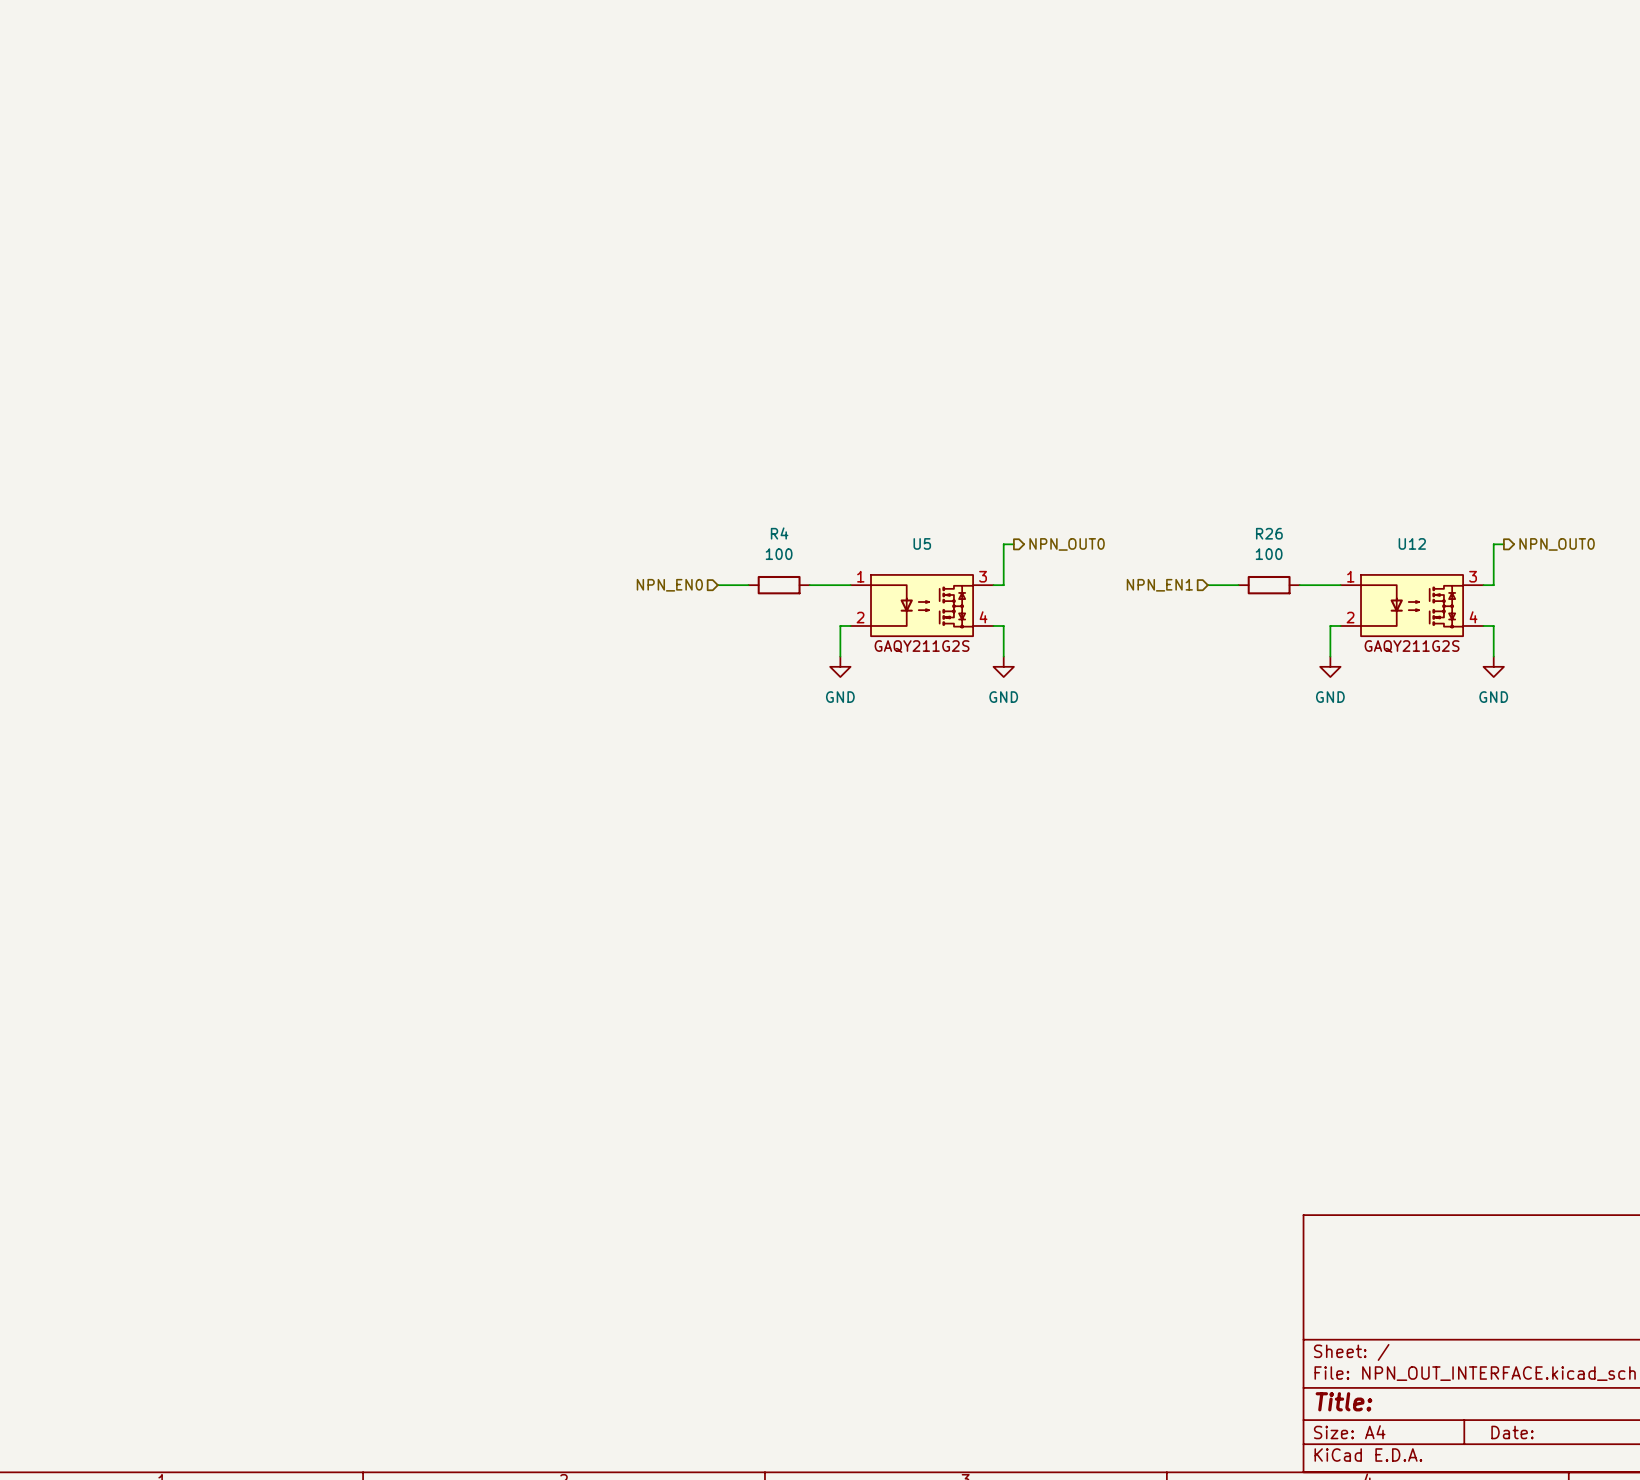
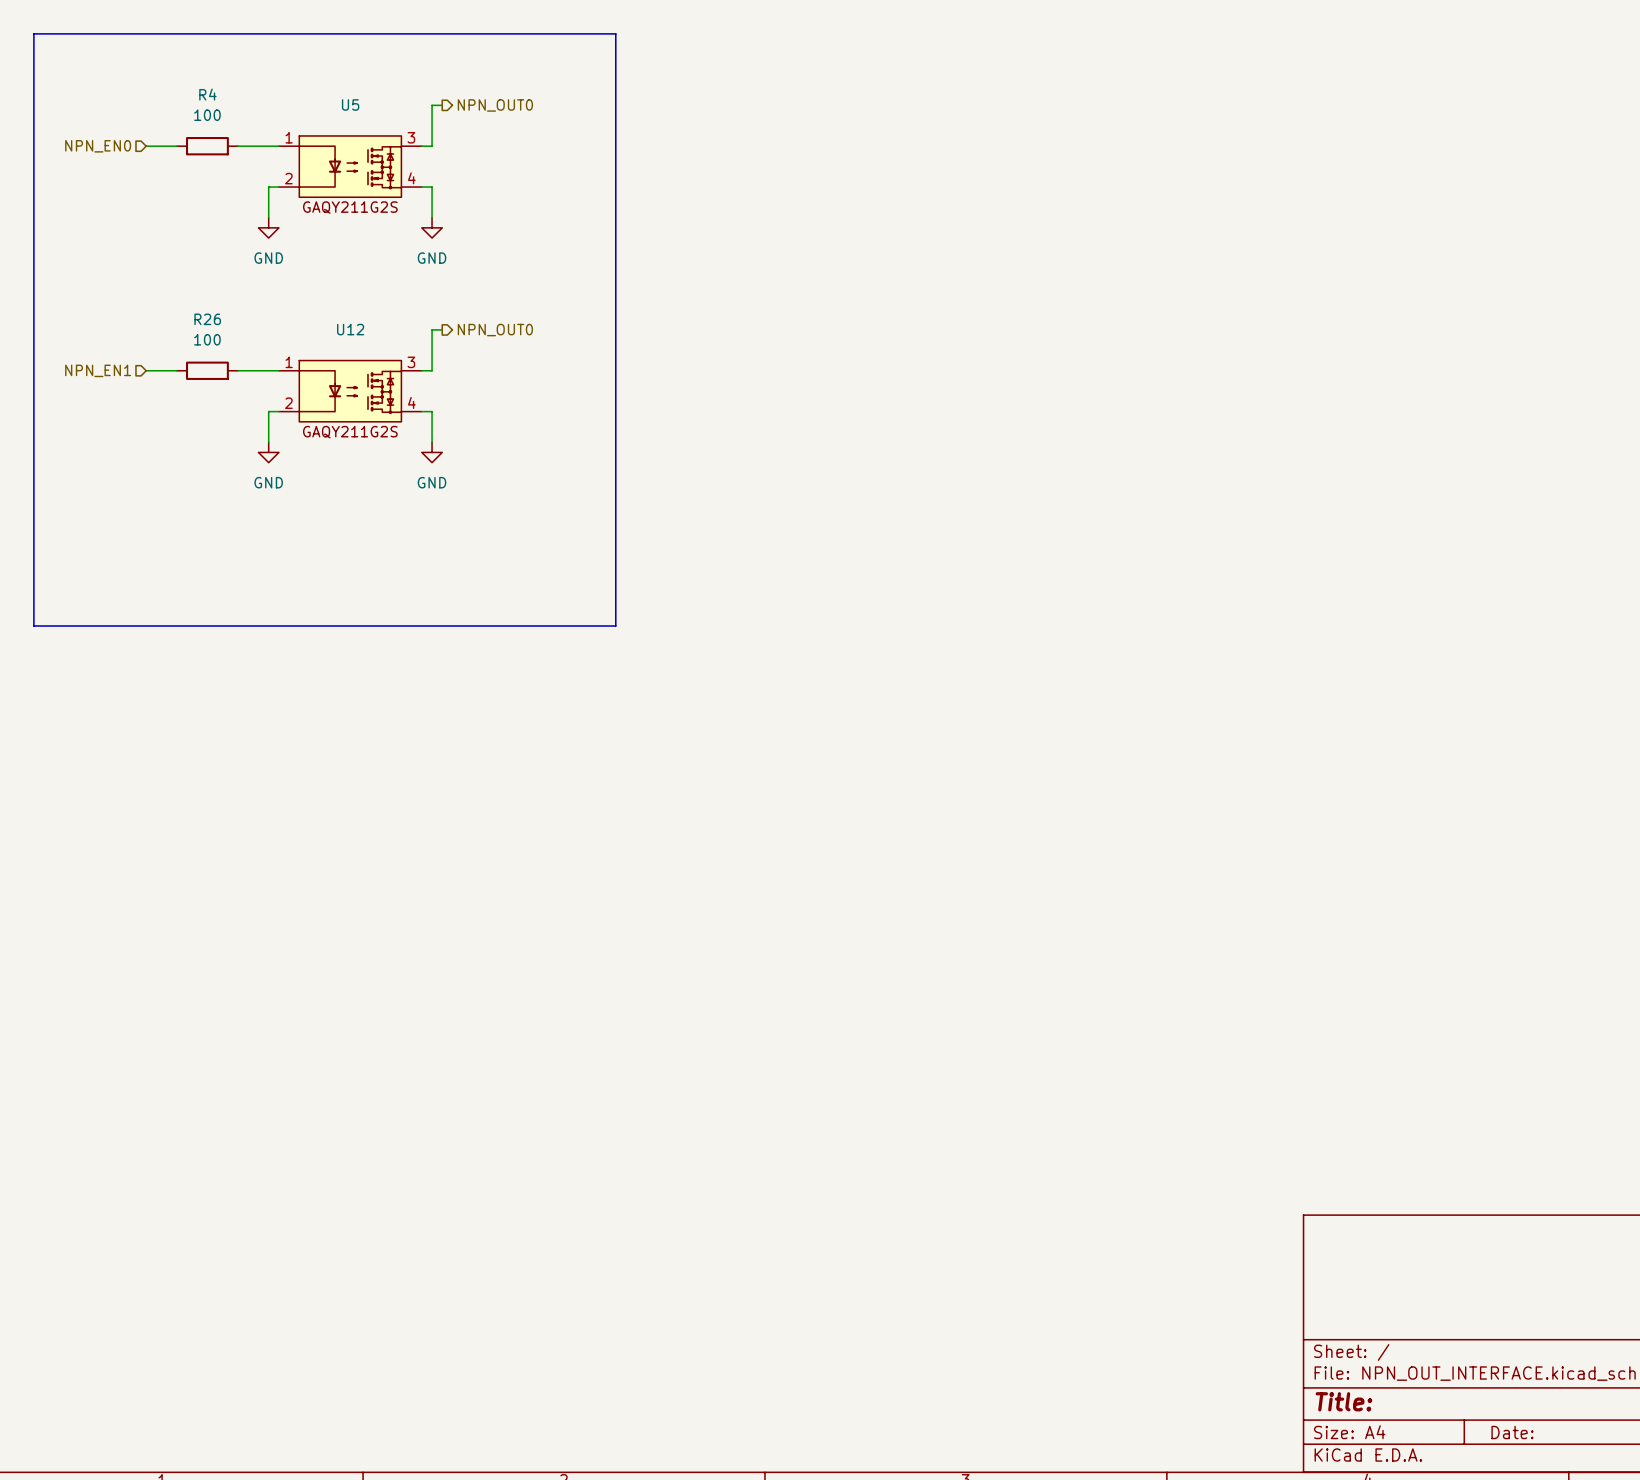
line: none -> (33, 33) (615, 33) (615, 625) (33, 625) (33, 33)
wire: none -> (442, 105) (432, 105) (432, 146) (421, 146)
hierarchical label: none -> NPN_OUT0 (495, 105)
hierarchical label: none -> NPN_EN0 (98, 146)
wire: none -> (146, 146) (176, 146)
wire: none -> (238, 146) (278, 146)
wire: none -> (278, 187) (268, 187) (268, 217)
wire: none -> (421, 187) (432, 187) (432, 217)
power symbol: none -> GND (268, 227)
power symbol: none -> GND (432, 227)
wire: none -> (442, 329) (432, 329) (432, 370) (421, 370)
hierarchical label: none -> NPN_OUT0 (495, 330)
hierarchical label: none -> NPN_EN1 (98, 370)
wire: none -> (146, 370) (176, 370)
wire: none -> (238, 370) (278, 370)
wire: none -> (278, 411) (268, 411) (268, 442)
wire: none -> (421, 411) (432, 411) (432, 442)
power symbol: none -> GND (268, 452)
power symbol: none -> GND (432, 452)
wire: (1013, 544) (1003, 544) (1003, 585) (993, 585) -> none
hierarchical label: NPN_OUT0 (1067, 544) -> none
wire: (1503, 544) (1493, 544) (1493, 585) (1483, 585) -> none
hierarchical label: NPN_OUT0 (1557, 544) -> none
hierarchical label: NPN_EN0 (669, 585) -> none
wire: (717, 585) (748, 585) -> none
R4 position: (779, 585) -> (207, 146)
wire: (809, 585) (850, 585) -> none
hierarchical label: NPN_EN1 (1159, 585) -> none
wire: (1207, 585) (1238, 585) -> none
R26 position: (1269, 585) -> (207, 370)
wire: (1299, 585) (1340, 585) -> none
U5 position: (922, 605) -> (350, 166)
U12 position: (1412, 605) -> (350, 391)
wire: (850, 625) (840, 625) (840, 656) -> none
wire: (993, 625) (1003, 625) (1003, 656) -> none
wire: (1340, 625) (1330, 625) (1330, 656) -> none
wire: (1483, 625) (1493, 625) (1493, 656) -> none
power symbol: GND (840, 666) -> none
power symbol: GND (1003, 666) -> none
power symbol: GND (1330, 666) -> none
power symbol: GND (1493, 666) -> none

